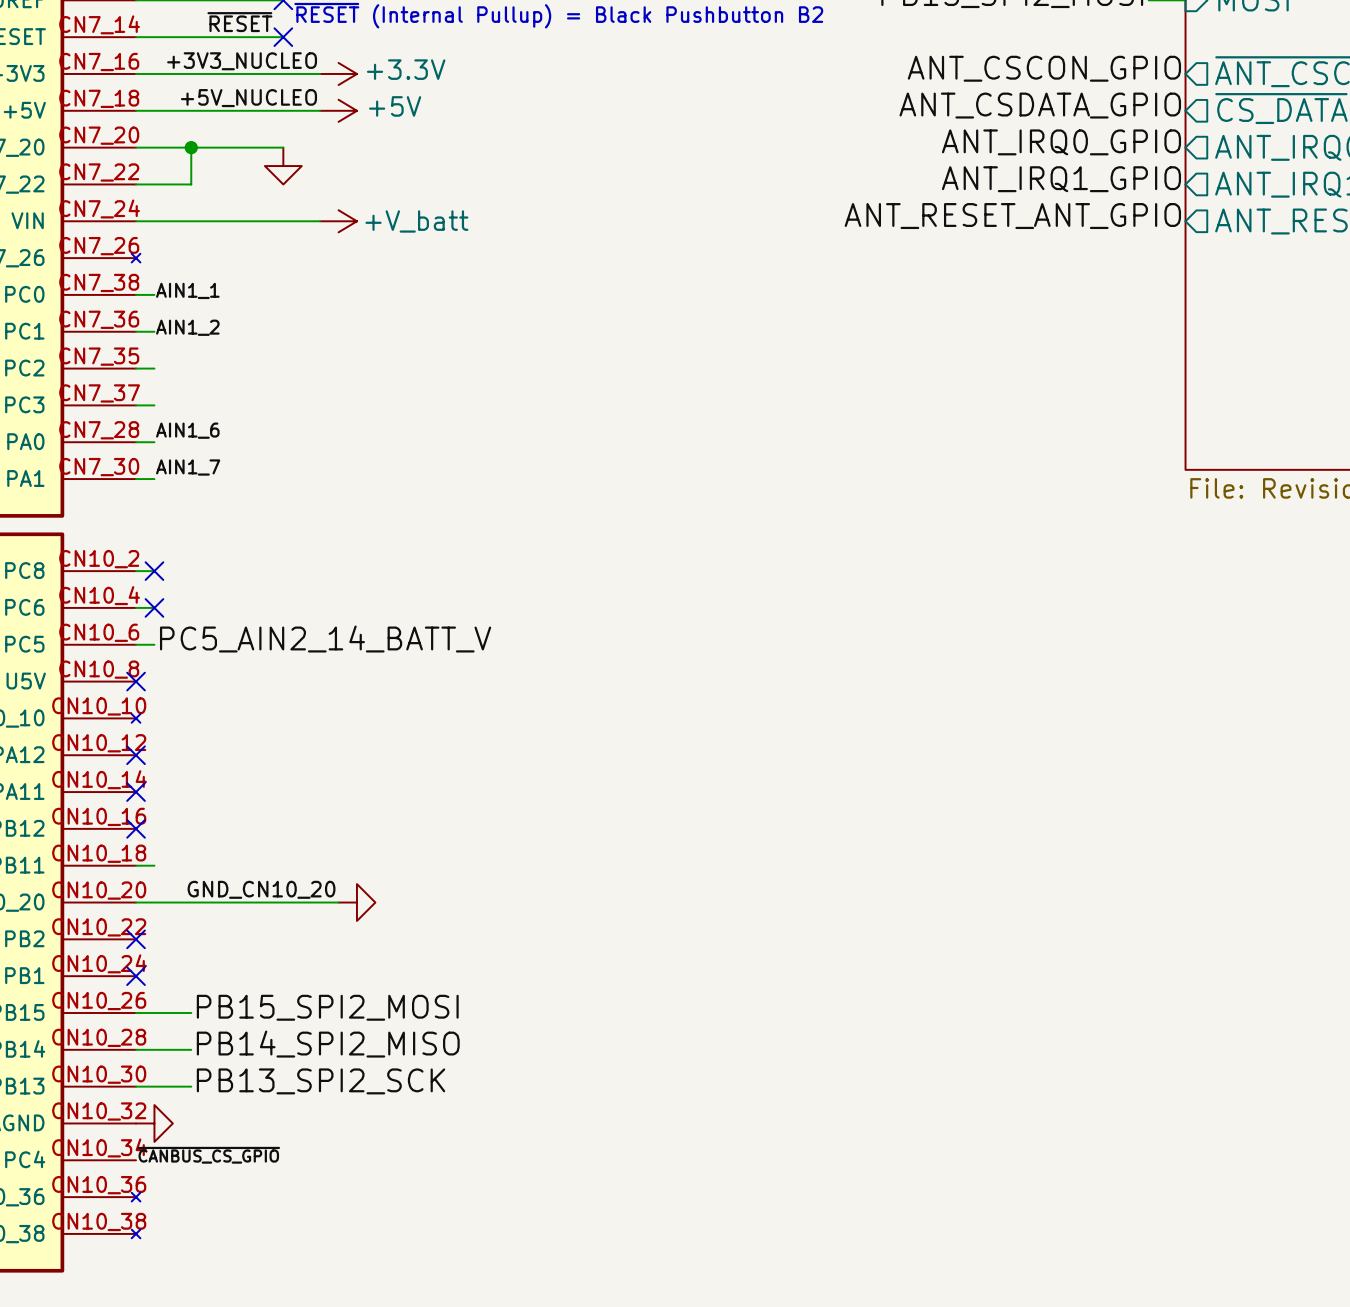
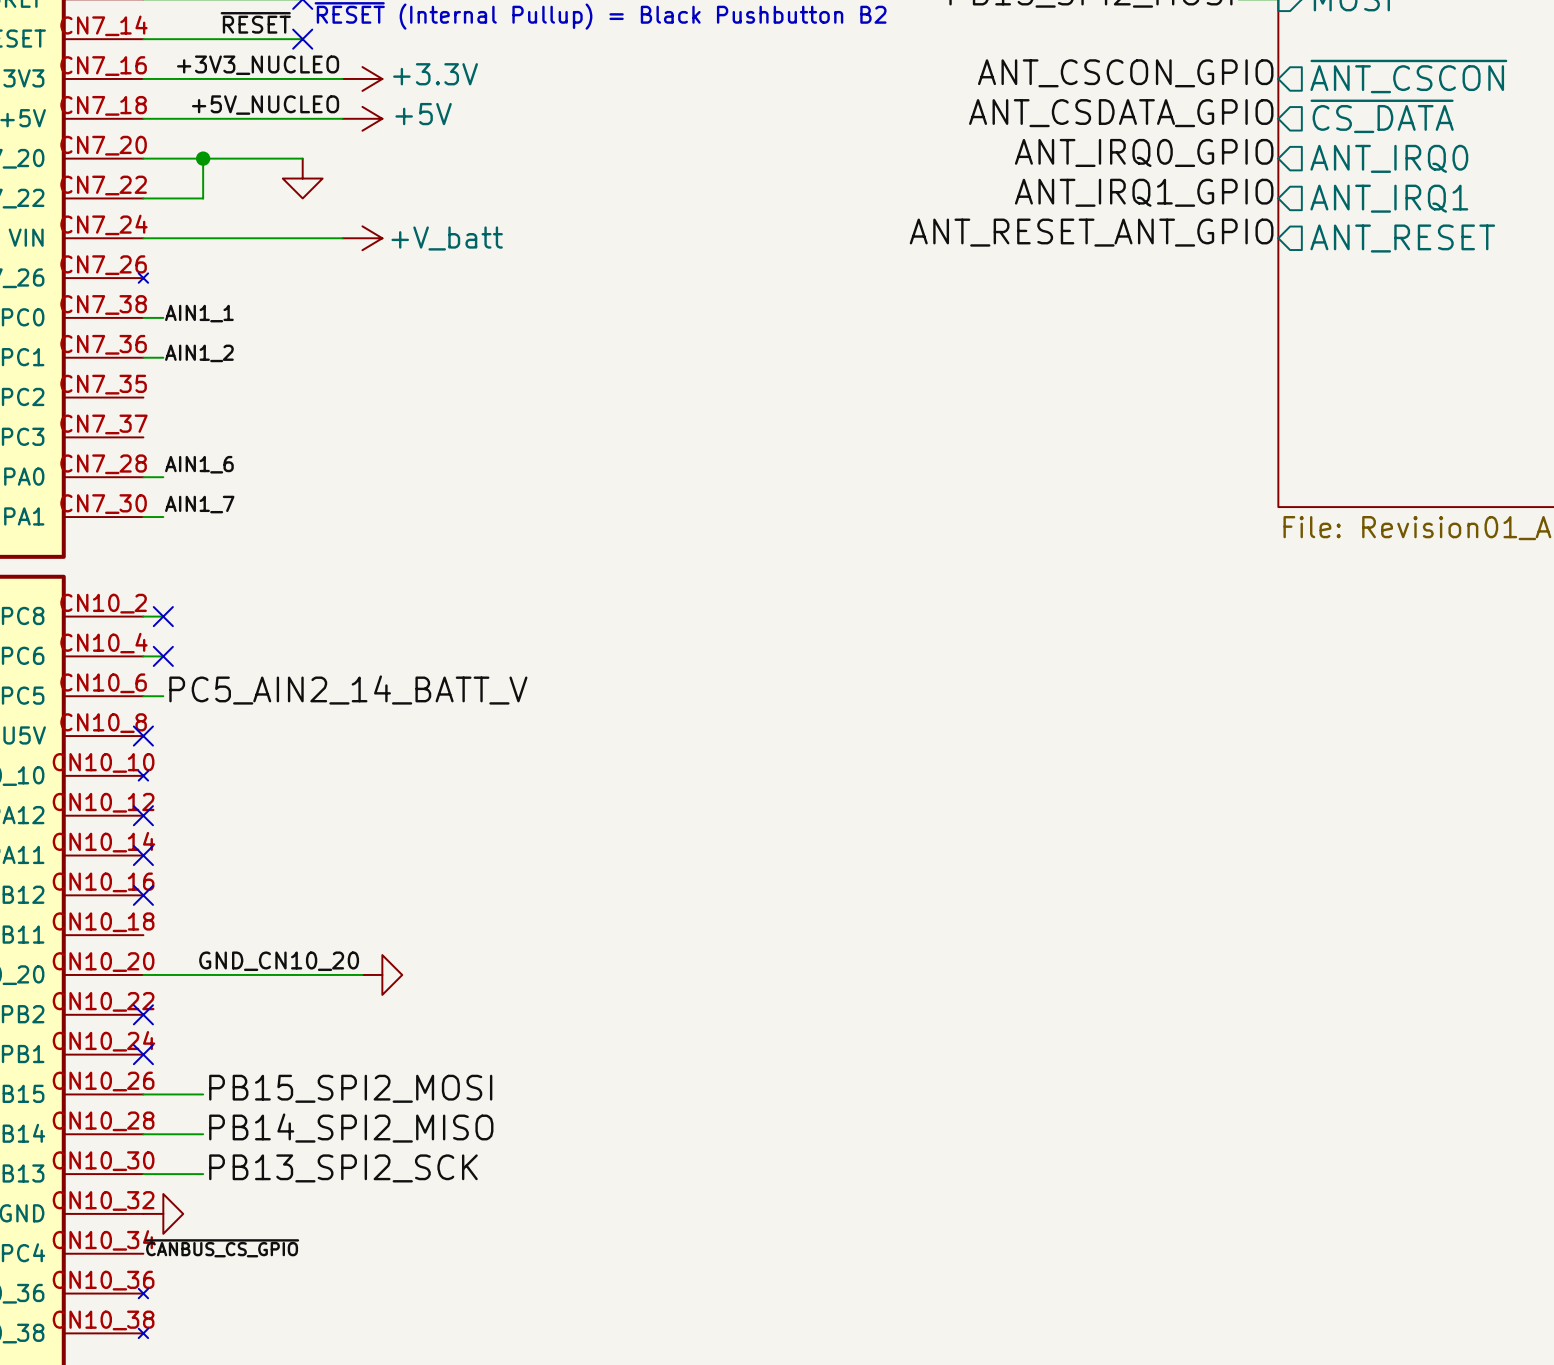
wire: (136, 368) (154, 368) -> none
wire: (136, 405) (154, 405) -> none
wire: (136, 865) (154, 865) -> none

